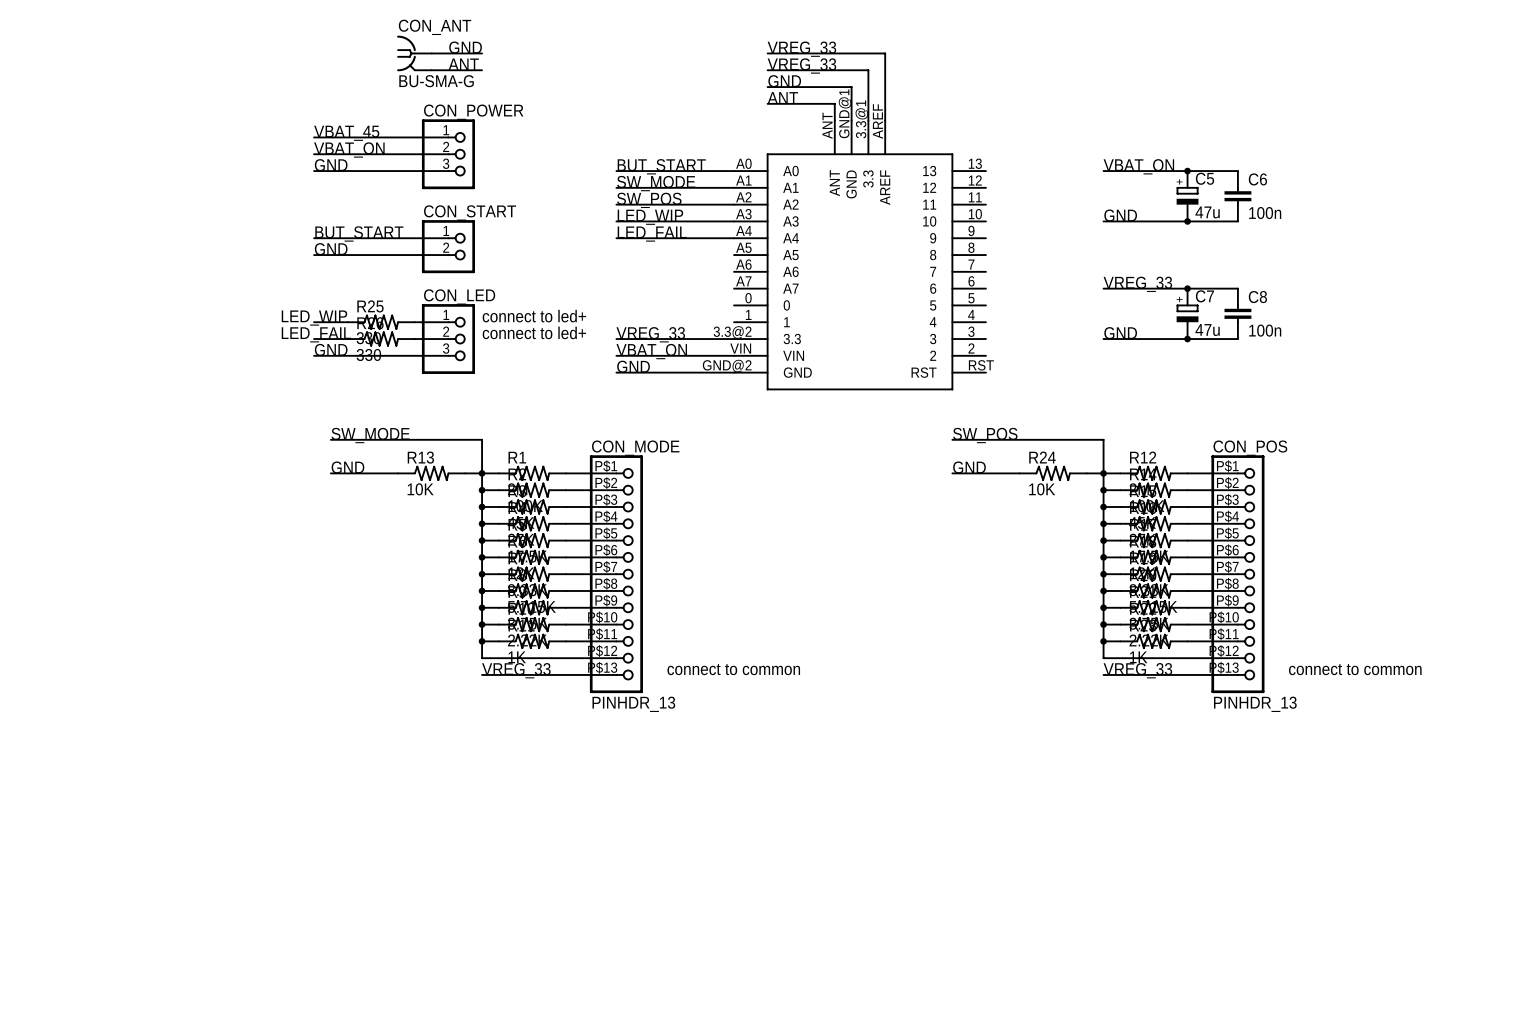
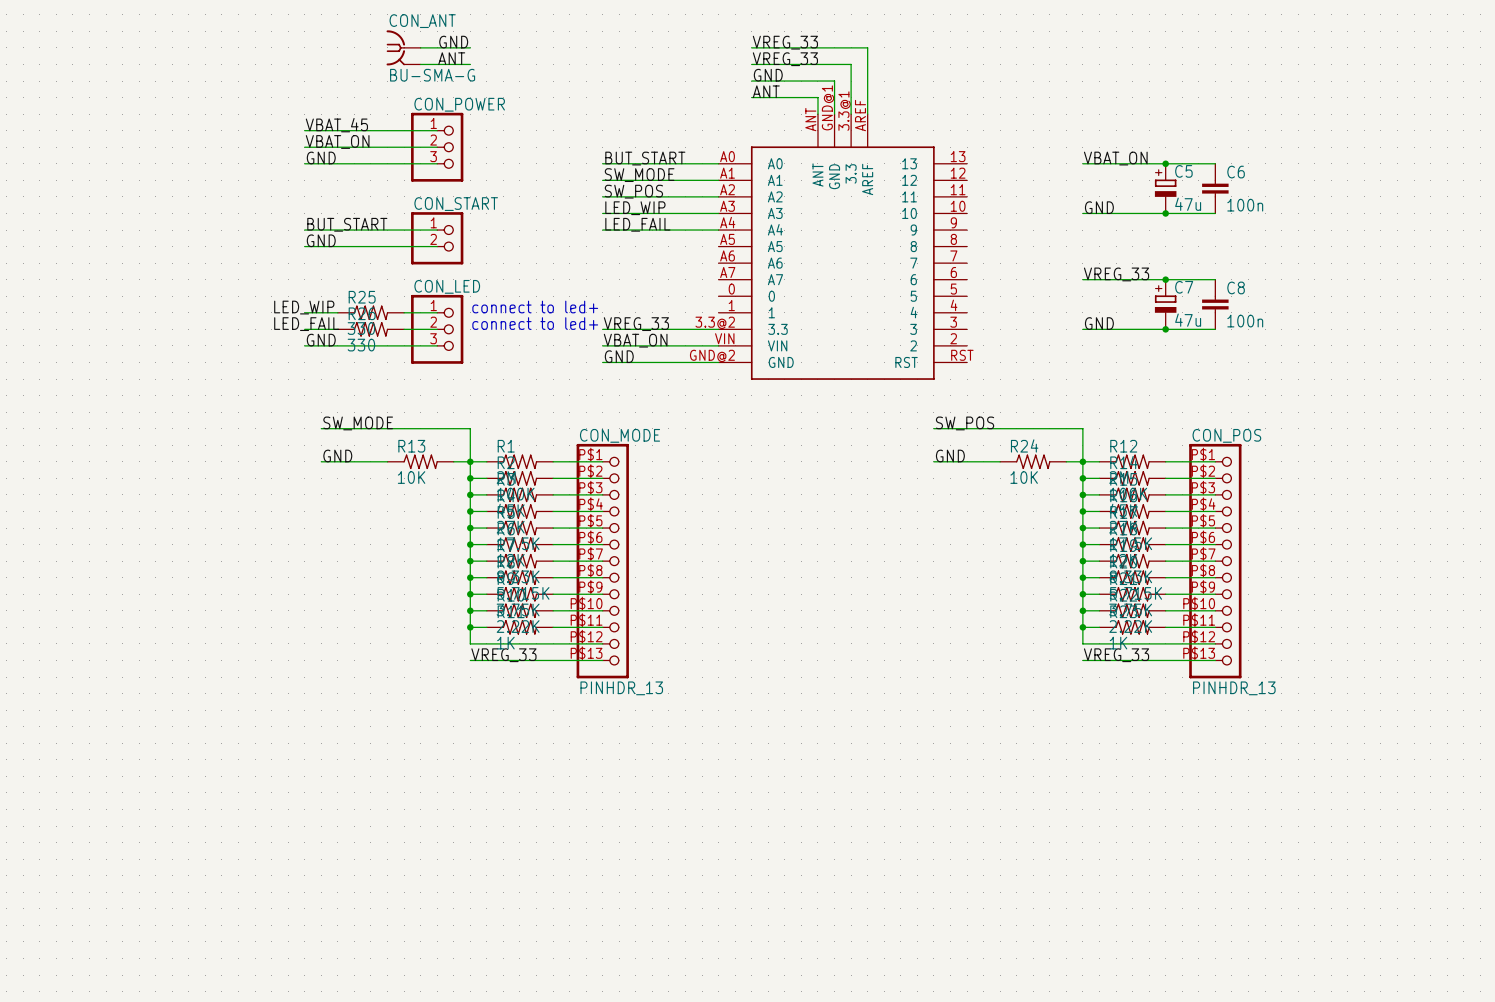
text: connect to common (733, 669) -> none
text: connect to common (1355, 669) -> none

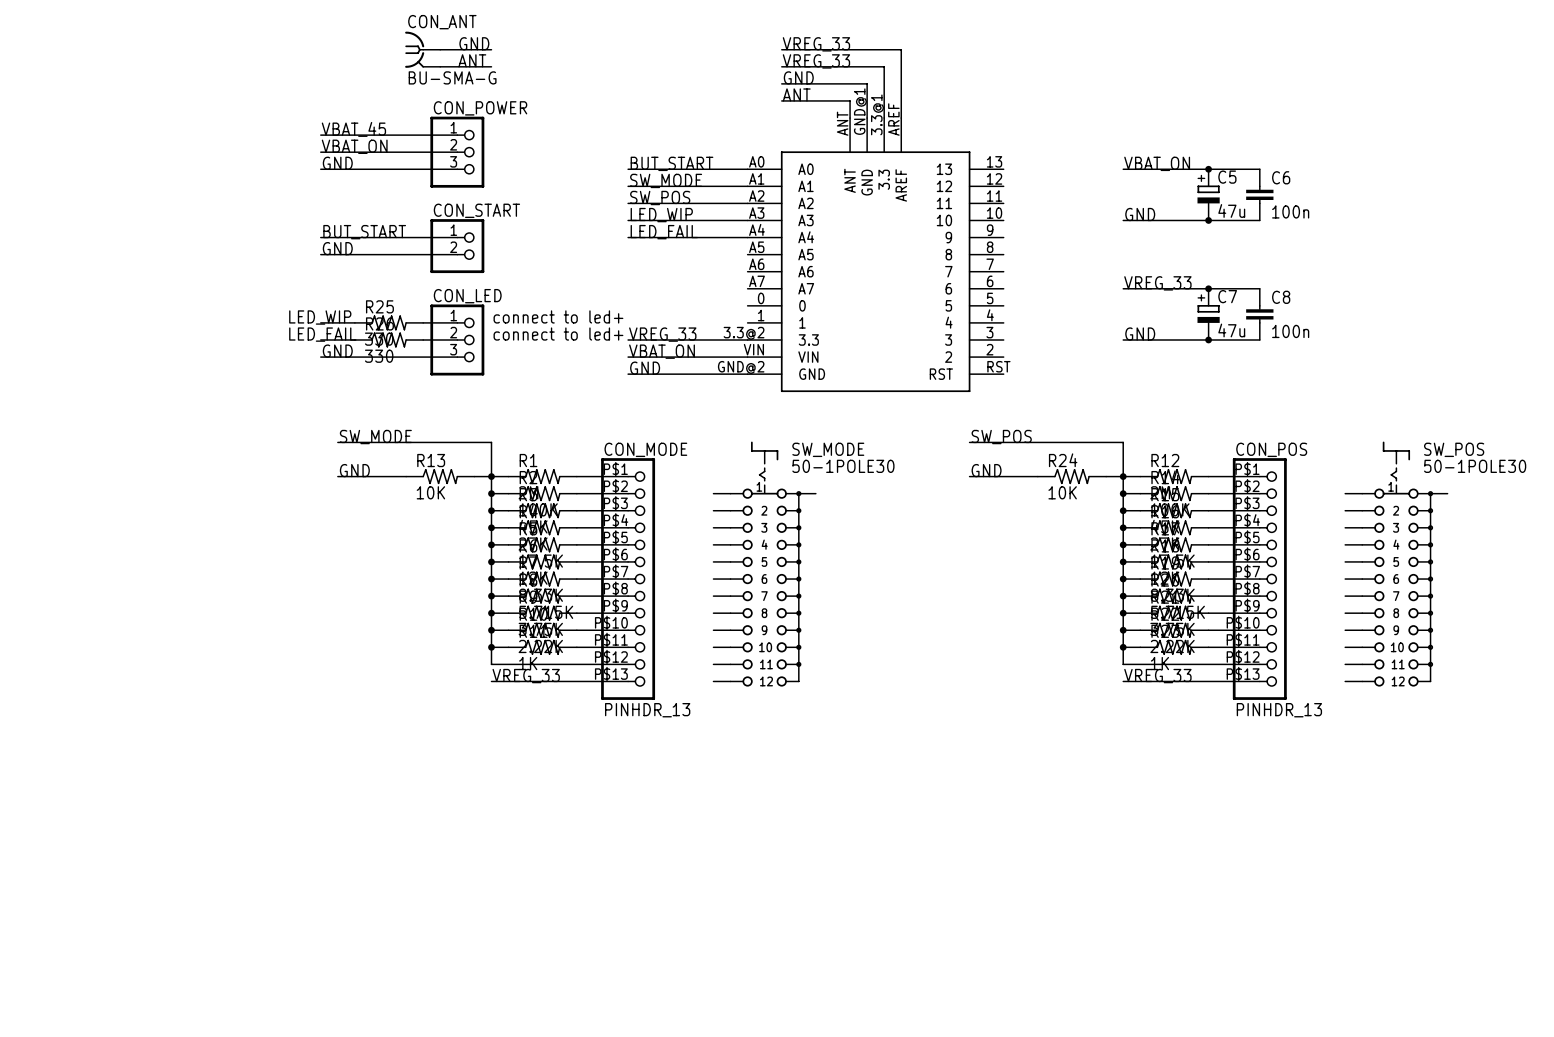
SW_MODE: none -> 50-1POLE30 (764, 564)
SW_POS: none -> 50-1POLE30 (1396, 564)

